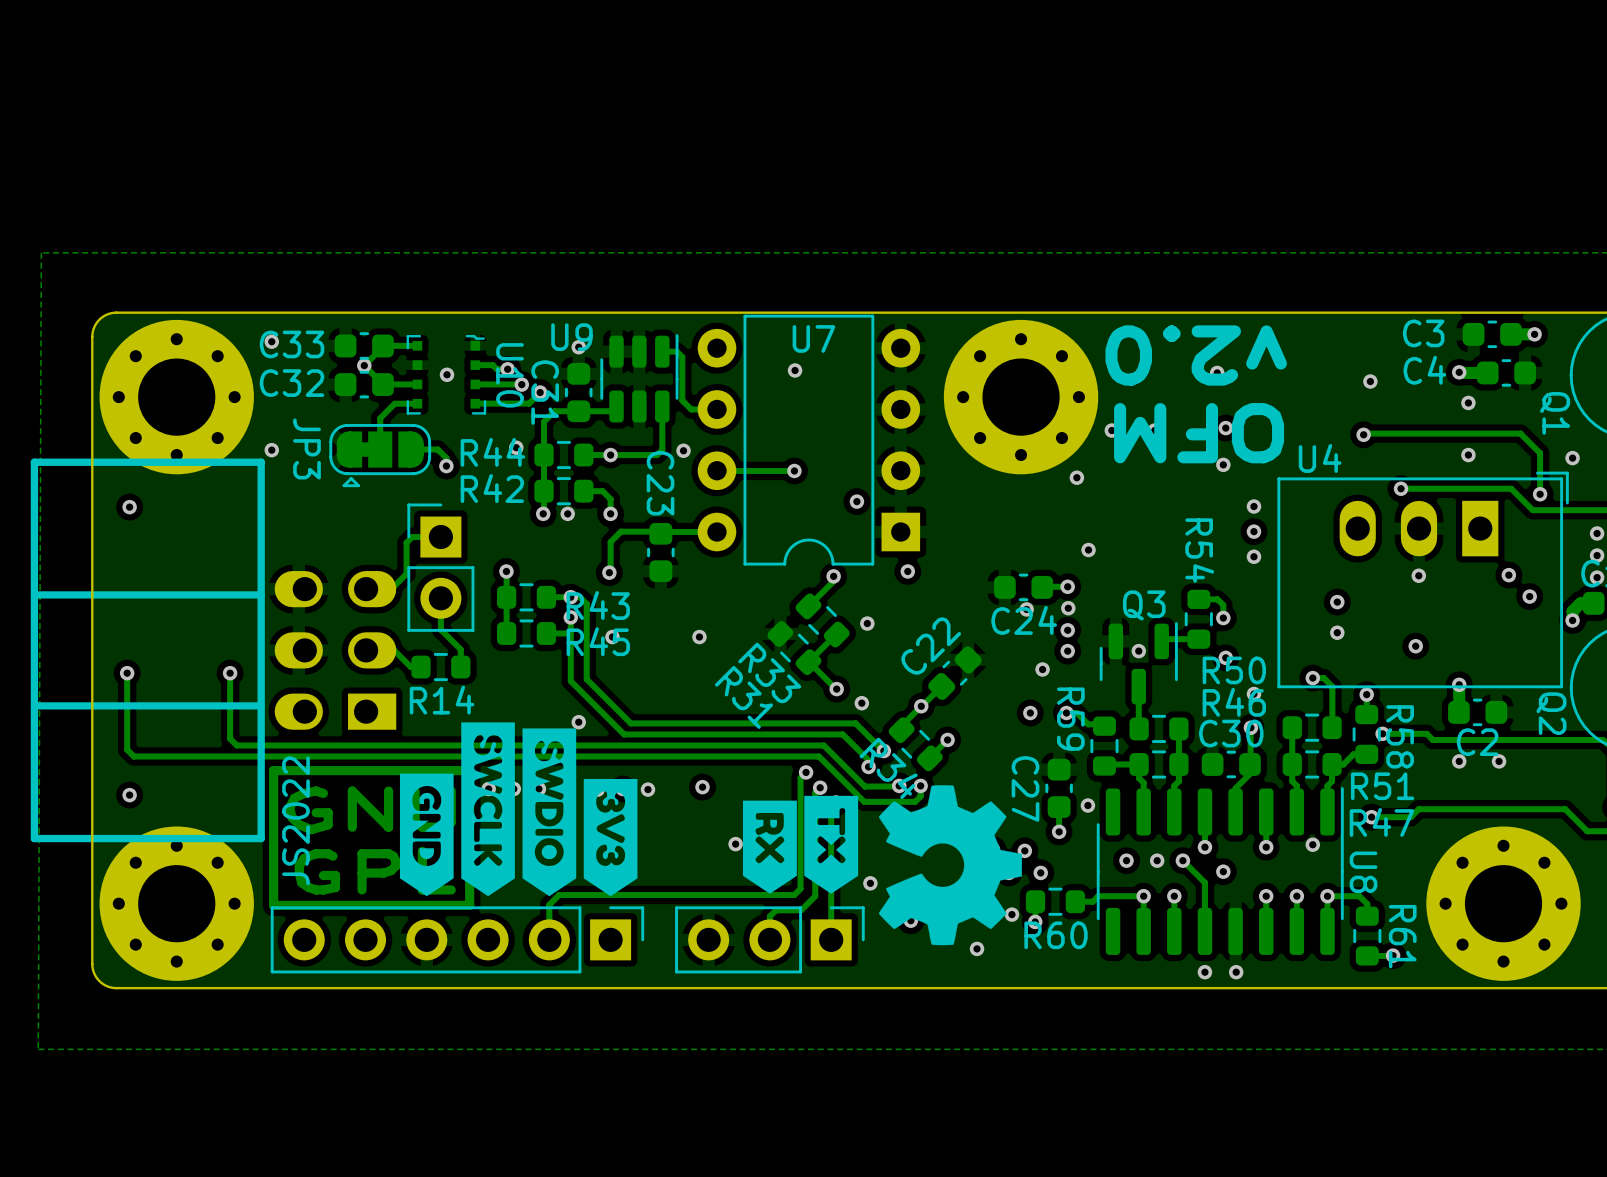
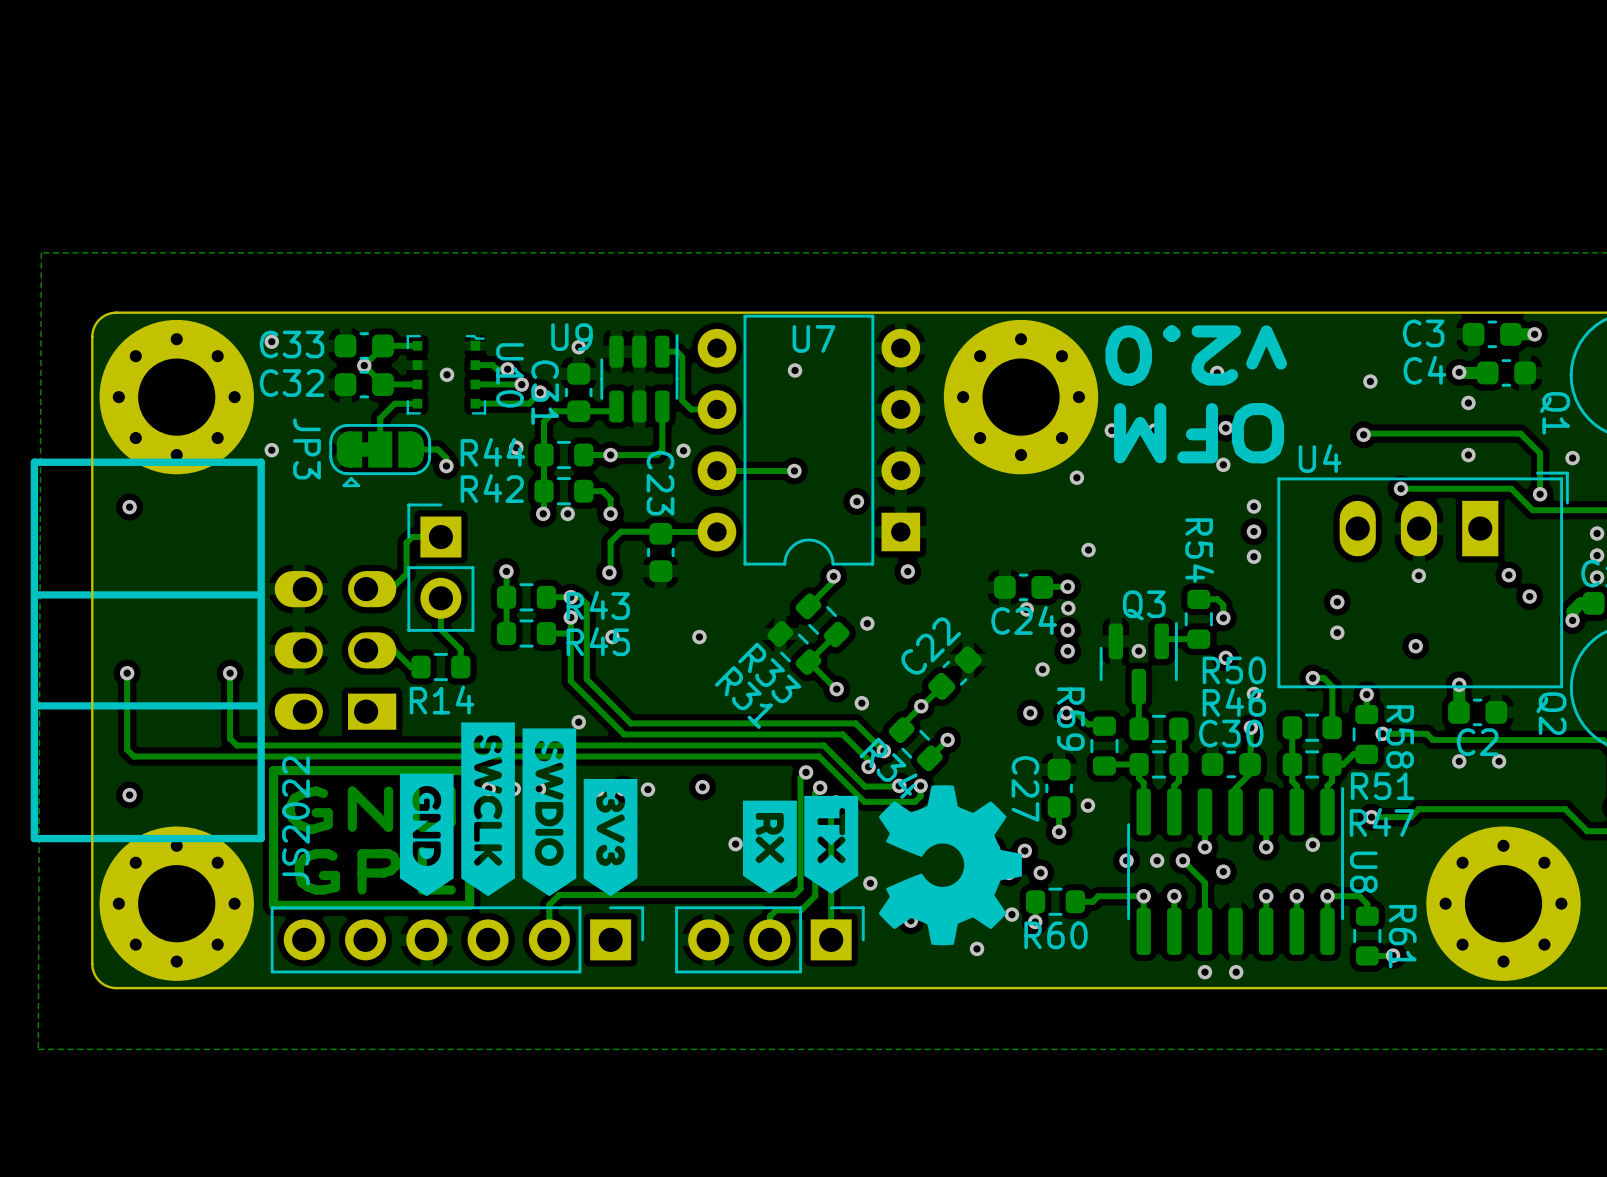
U8 footprint: [1096, 787, 1344, 955] -> [1127, 787, 1345, 955]

